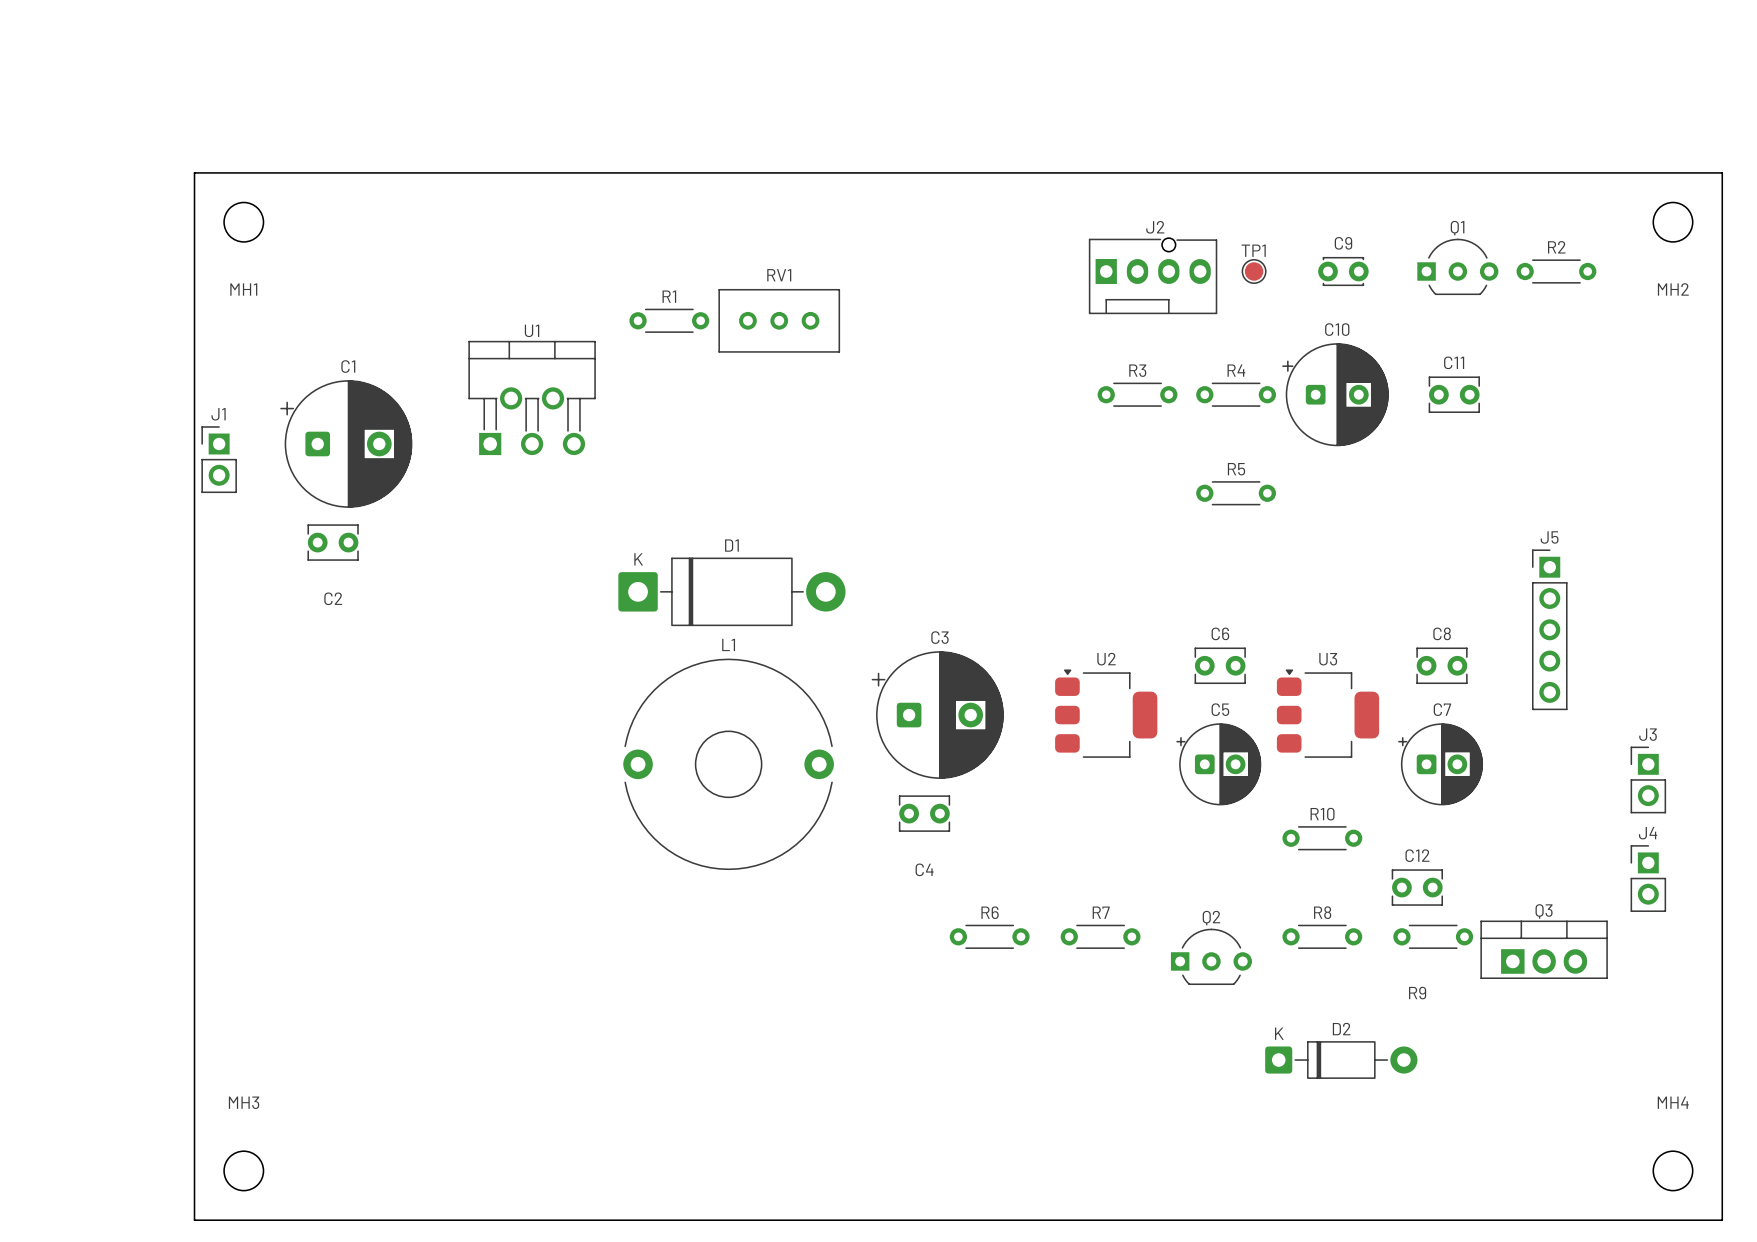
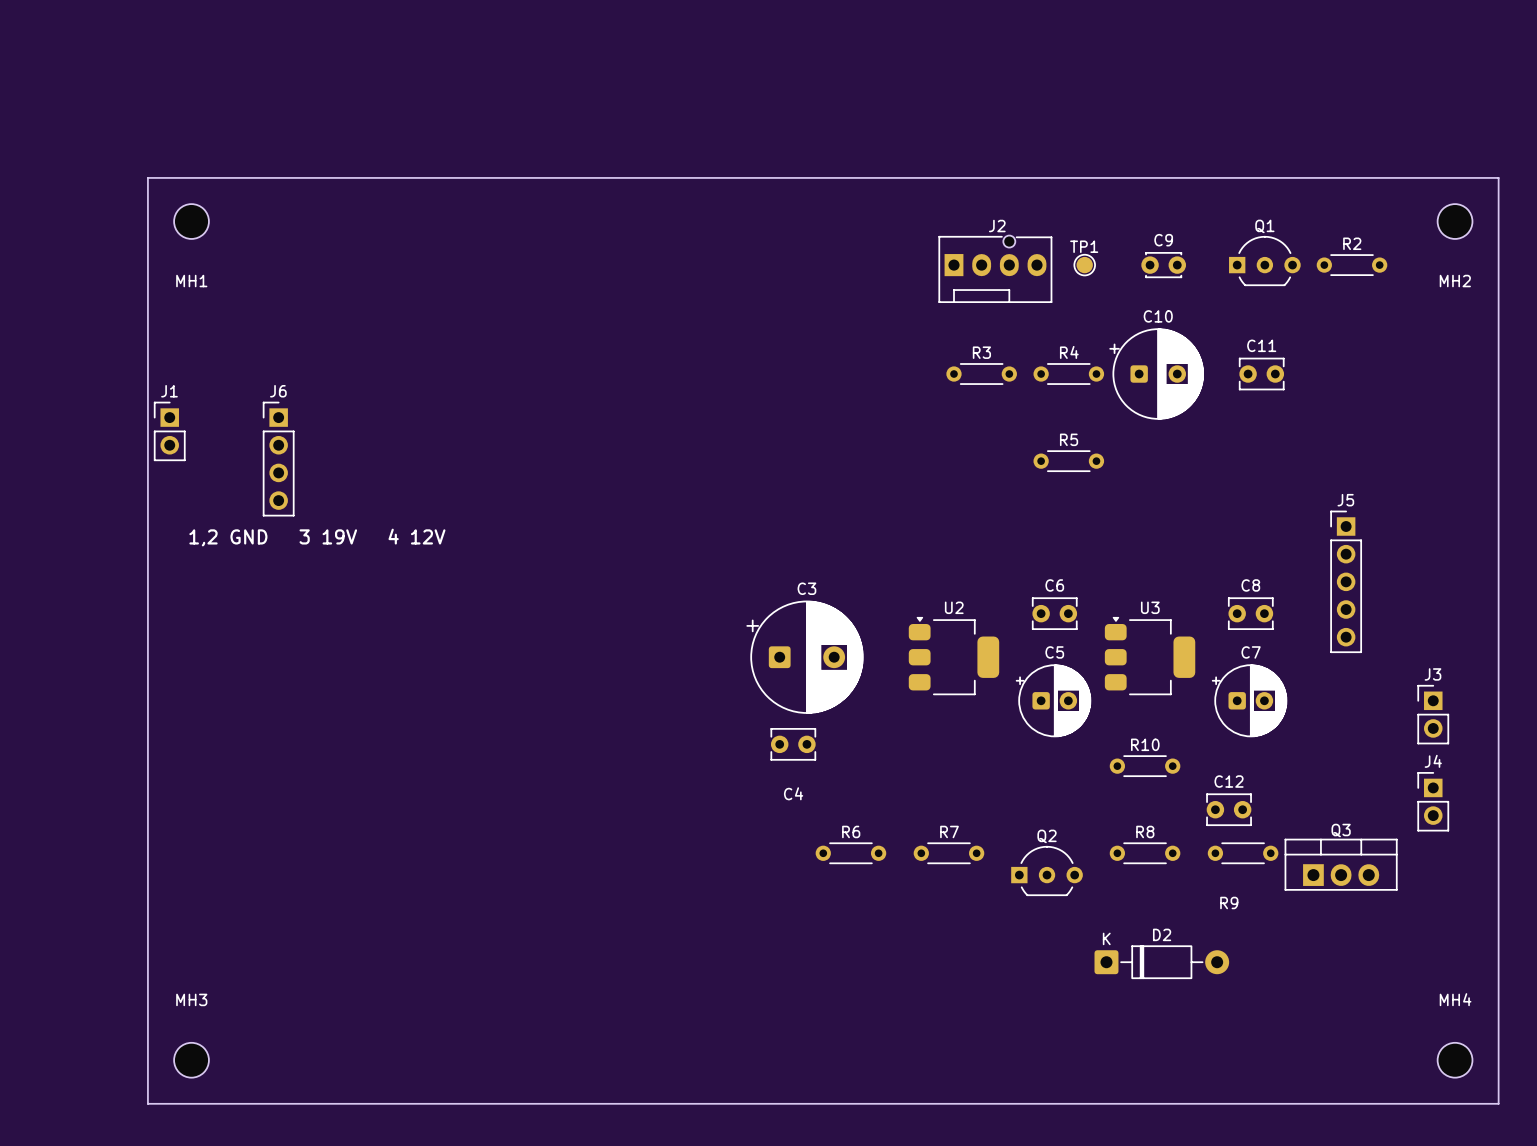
R1: (669, 320) -> none
RV1: (779, 320) -> none
U1: (532, 397) -> none
C1: (346, 443) -> none
J6: none -> (278, 459)
C2: (333, 542) -> none
text: none -> 1,2 GND 3 19V 4 12V (317, 537)
D1: (731, 591) -> none
L1: (728, 764) -> none

